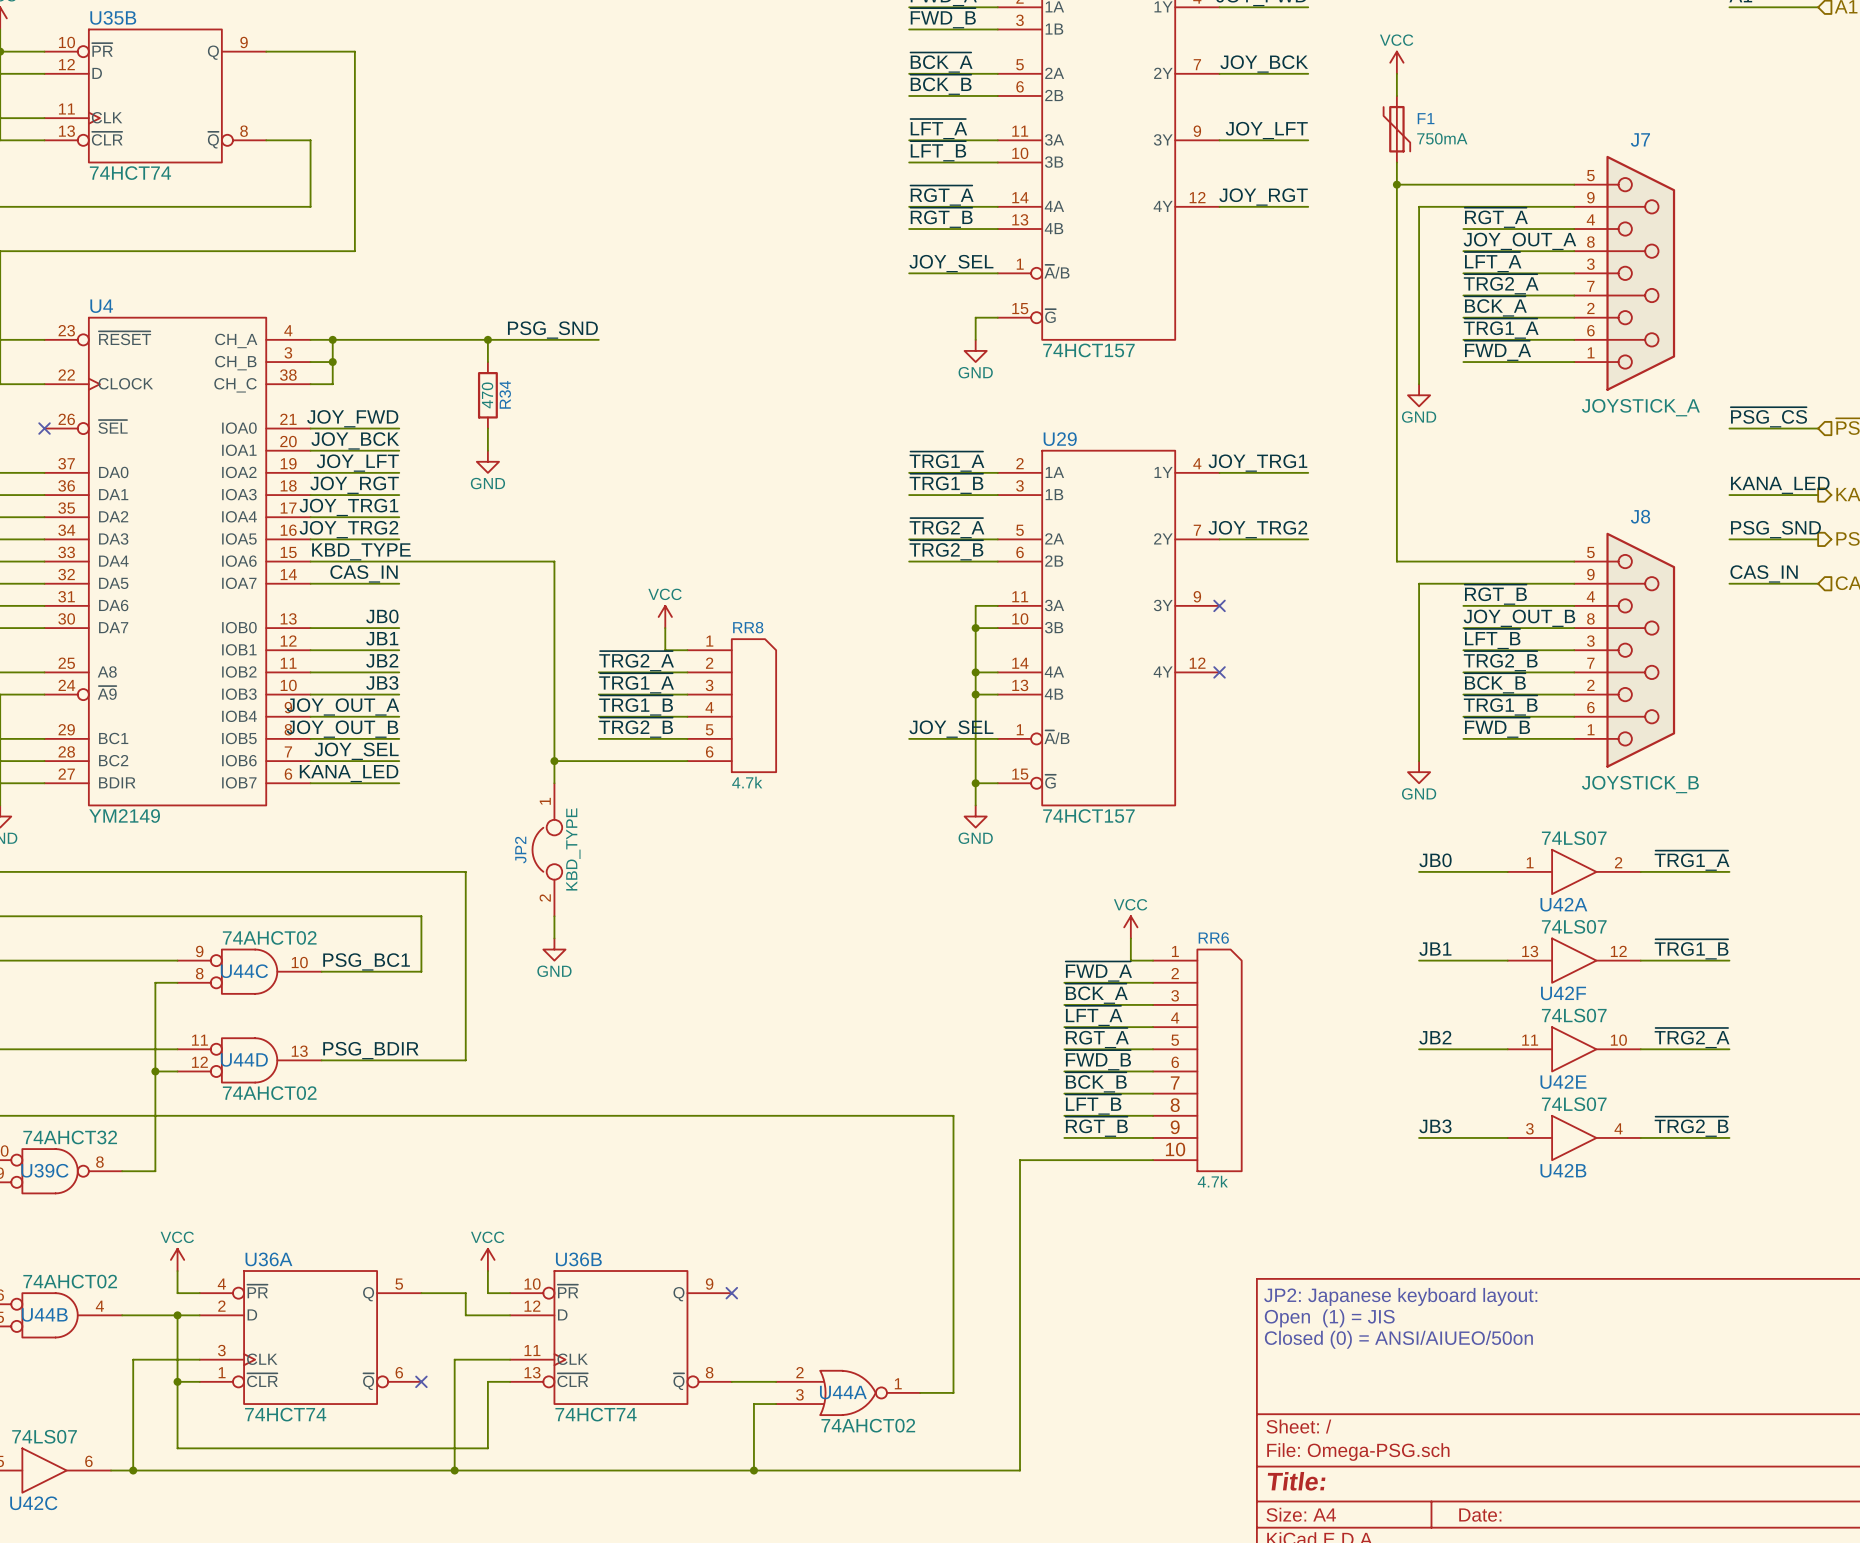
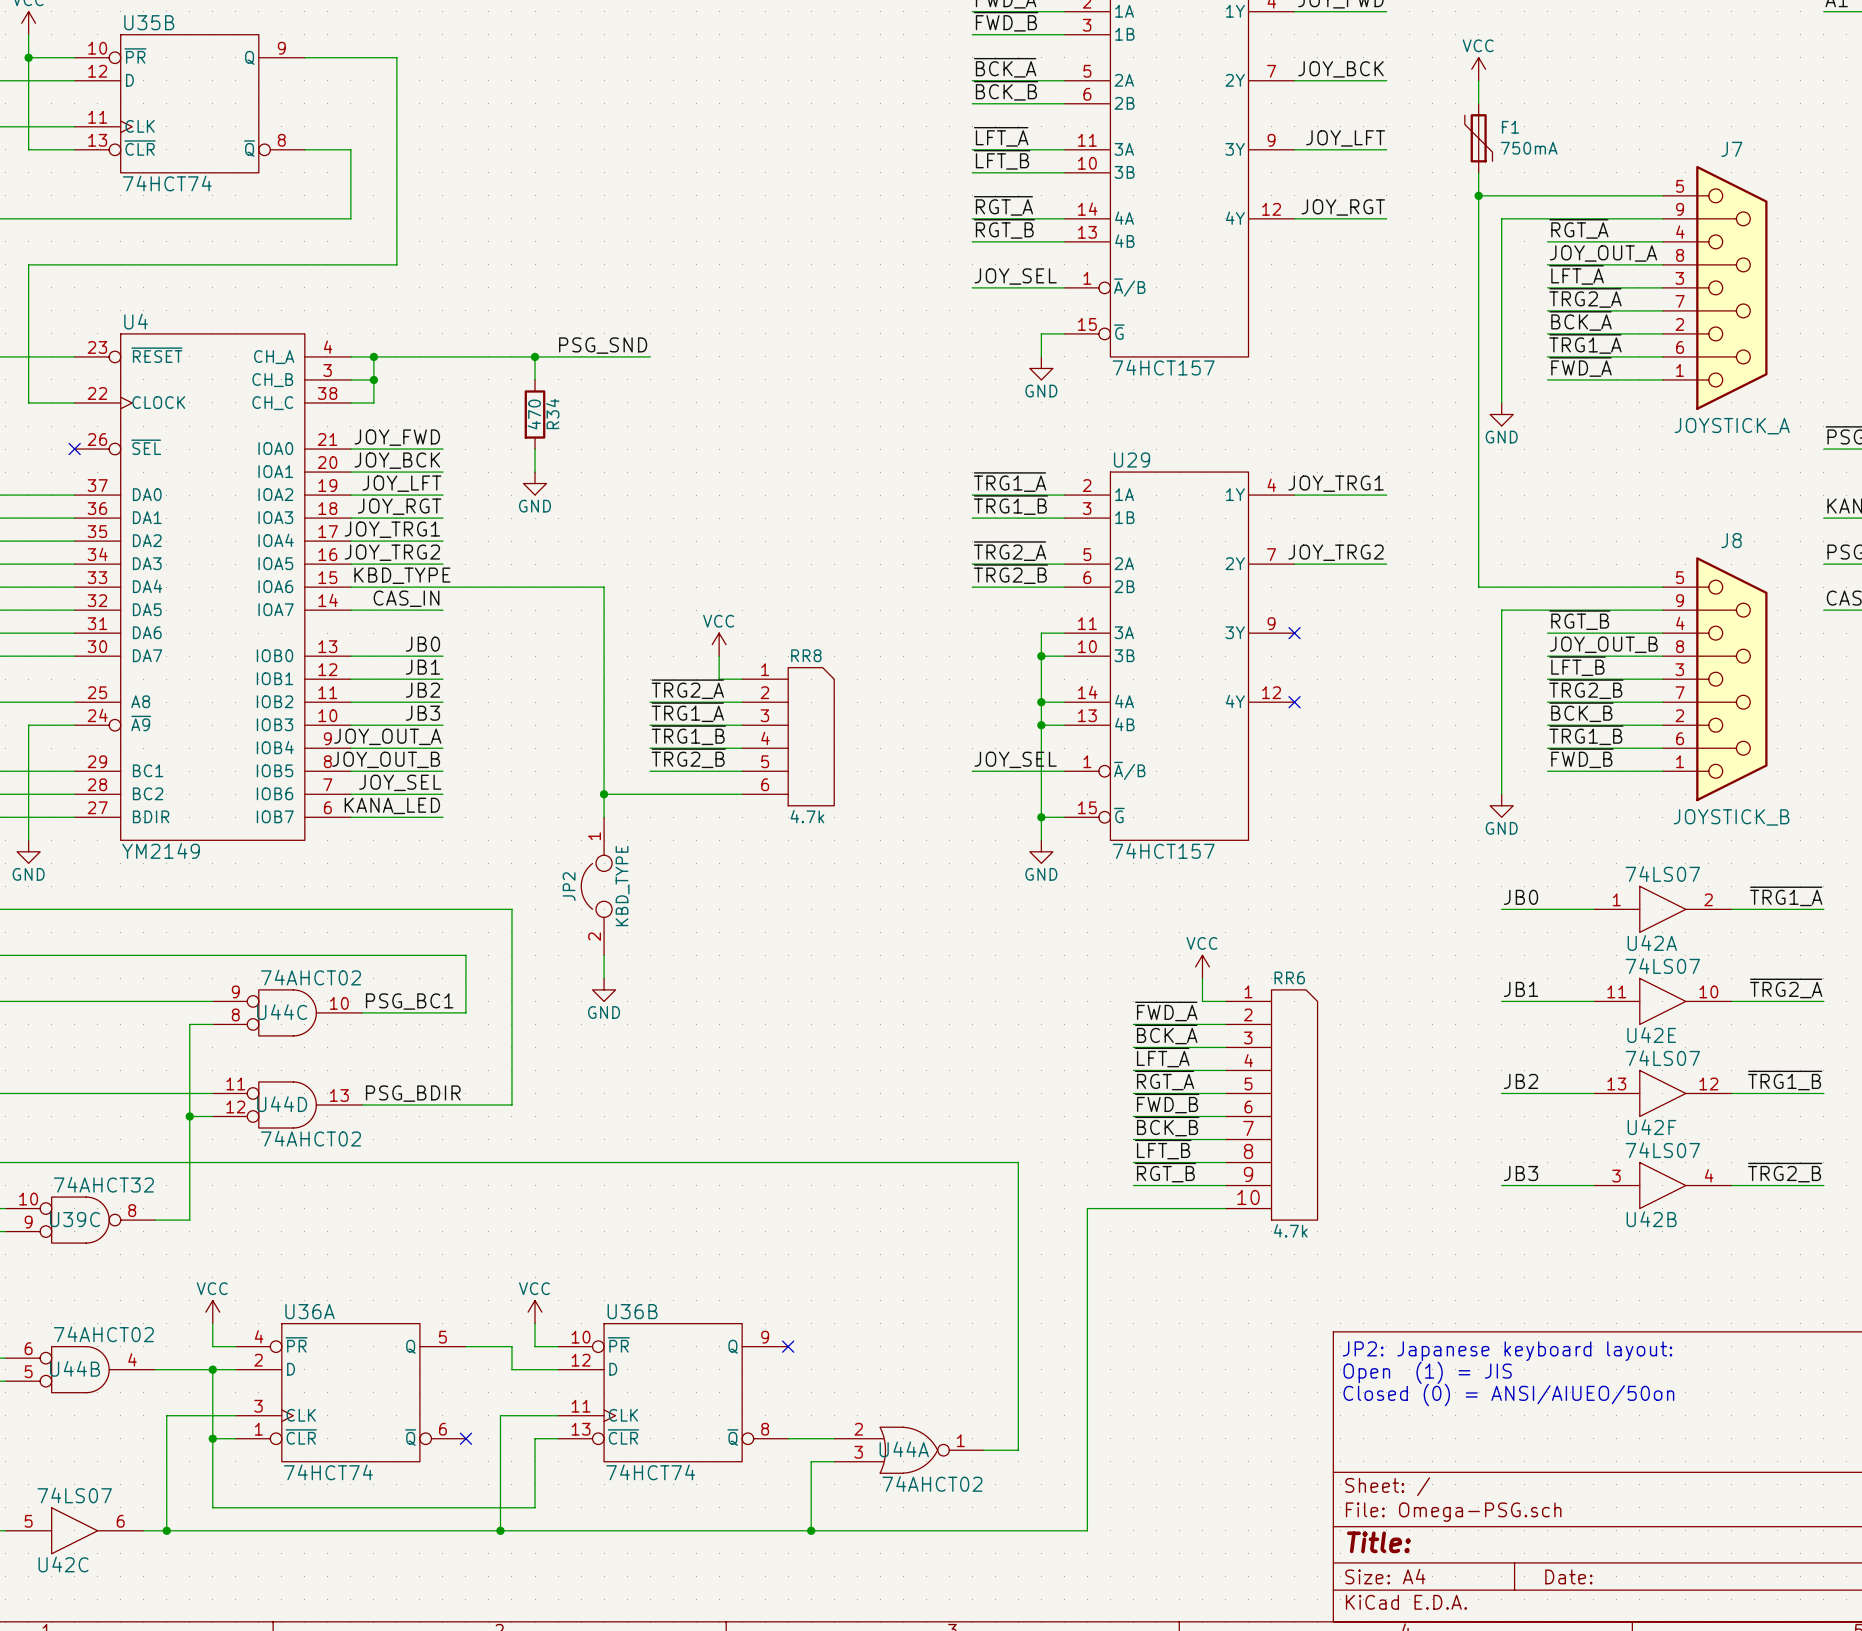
label: ~{TRG1_B} (1691, 949) -> ~{TRG2_A} (1786, 988)
U42F position: (1574, 960) -> (1662, 1093)
label: ~{TRG2_A} (1692, 1038) -> ~{TRG1_B} (1785, 1080)
U42E position: (1574, 1049) -> (1662, 1001)

